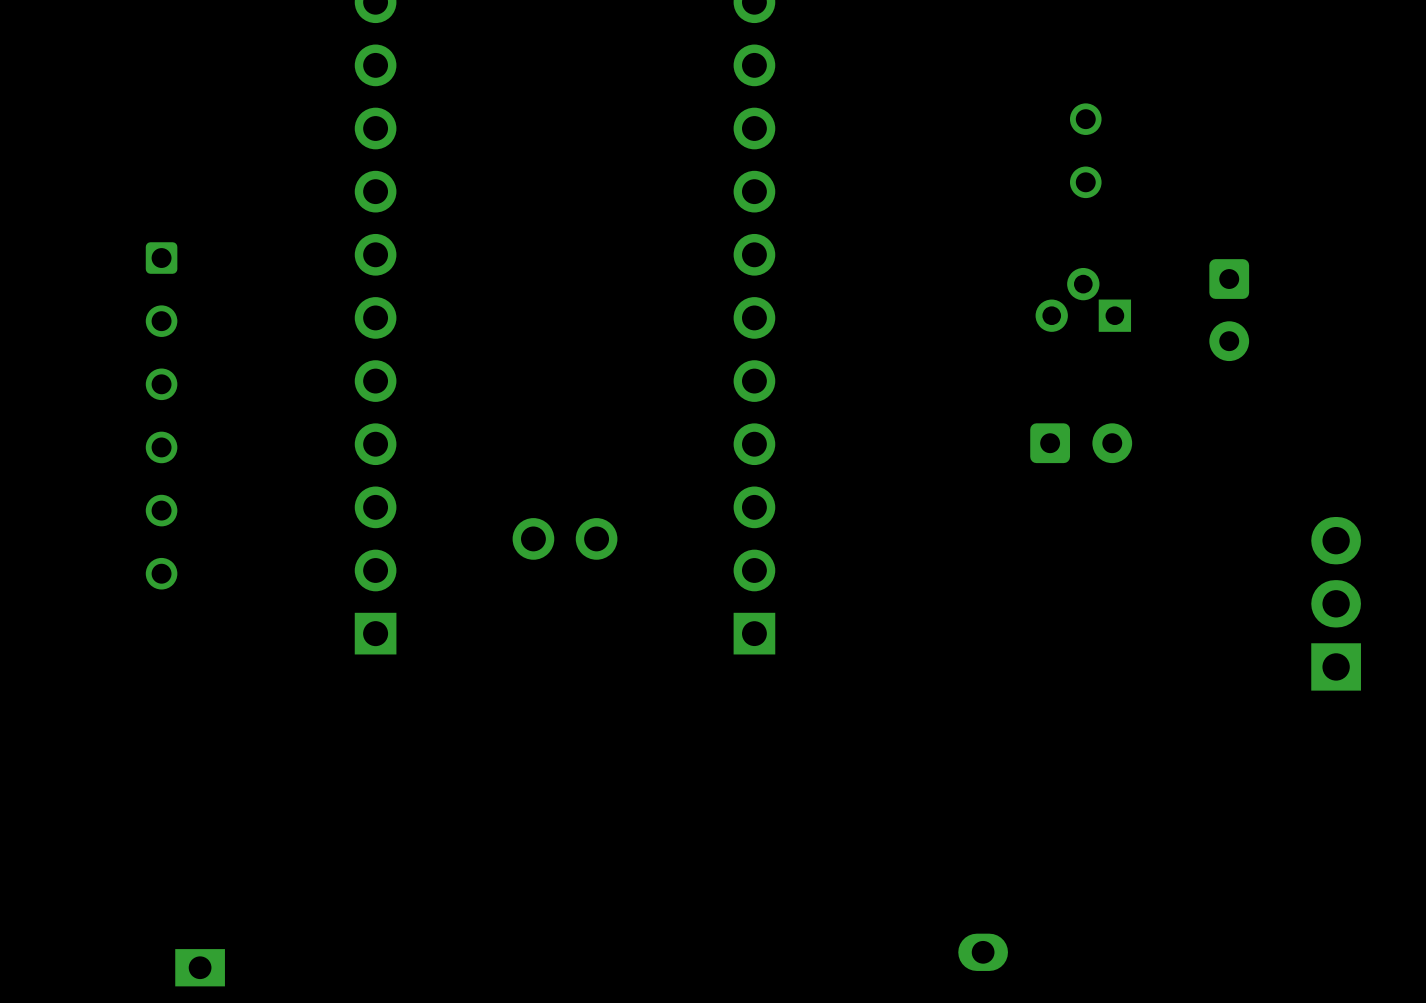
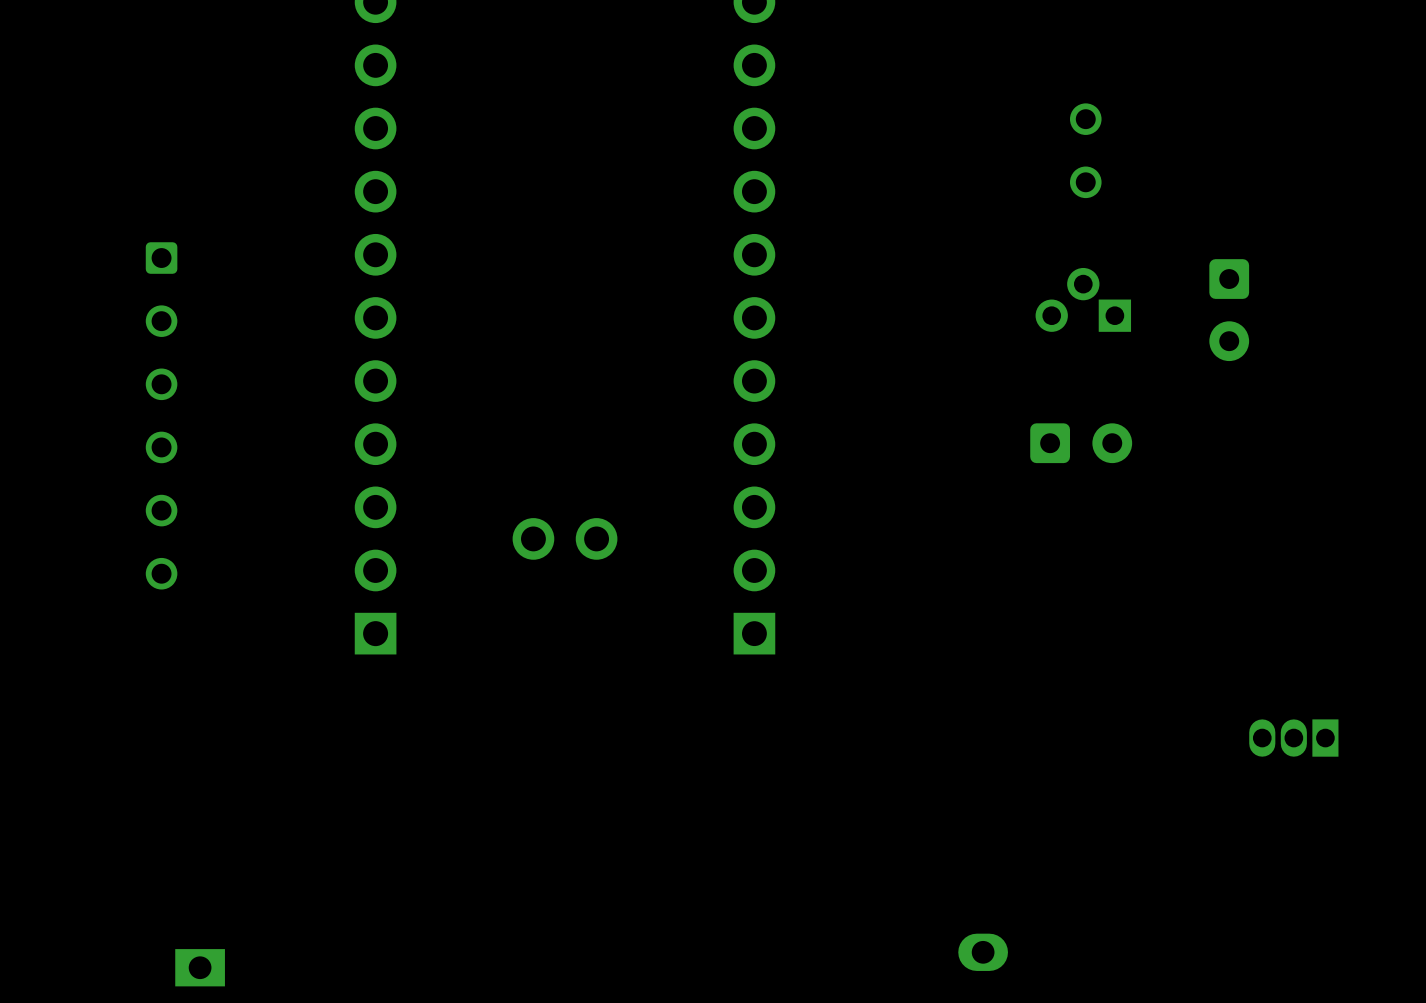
part: (1336, 603) -> none
part: none -> (1293, 738)

